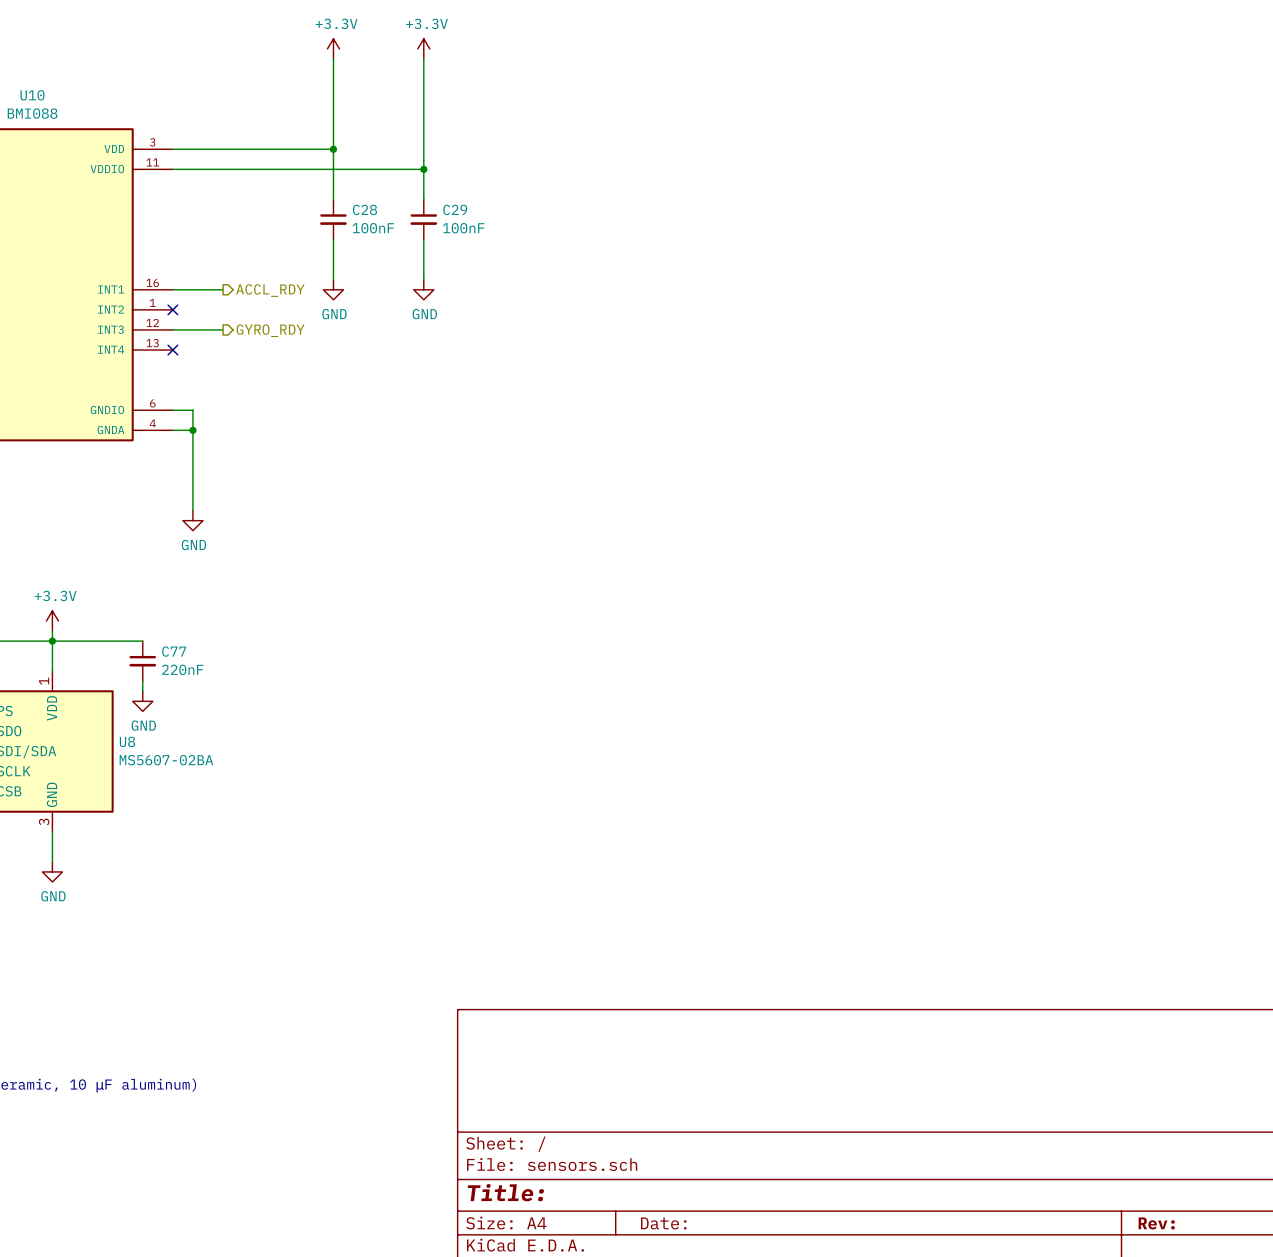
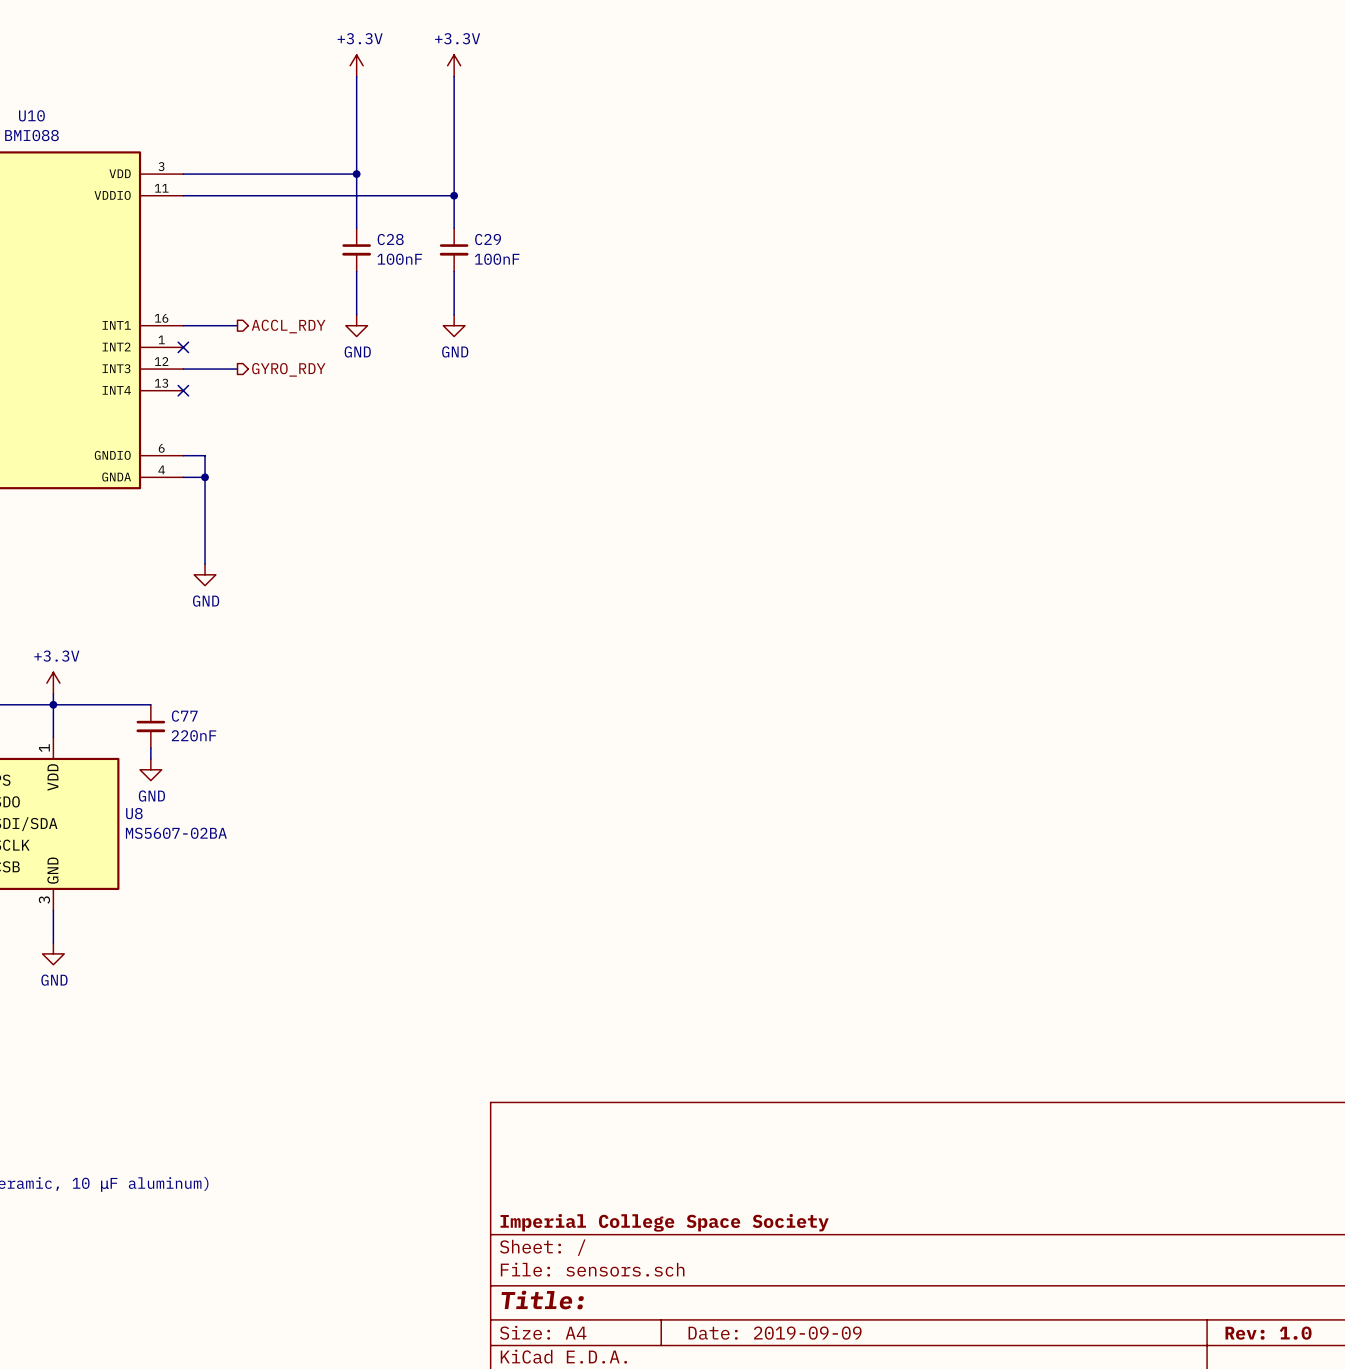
title block: none -> Imperial College Space Society (664, 1222)
title block: Date: (663, 1223) -> Date: 2019-09-09 (775, 1333)
title block: Rev: (1156, 1223) -> Rev: 1.0 (1268, 1333)

